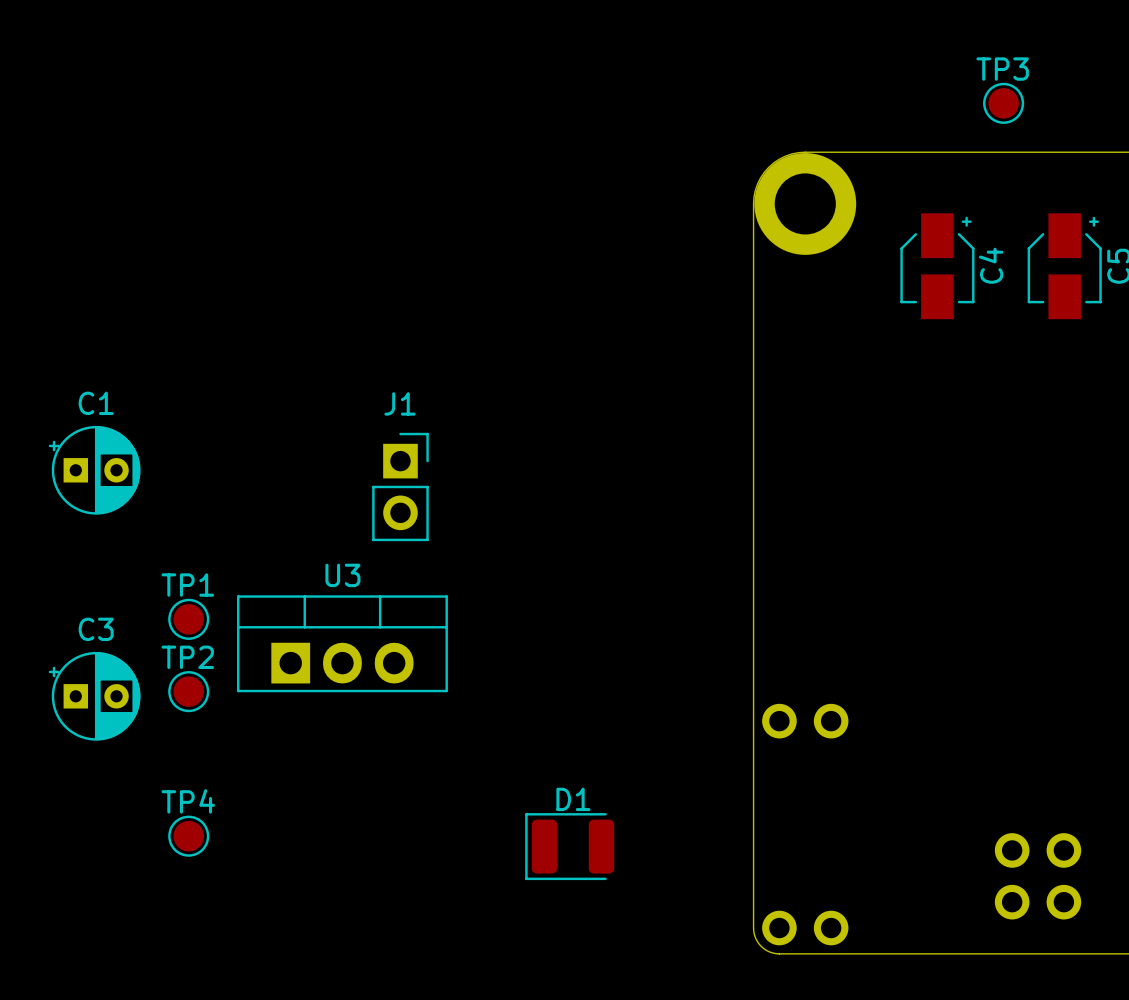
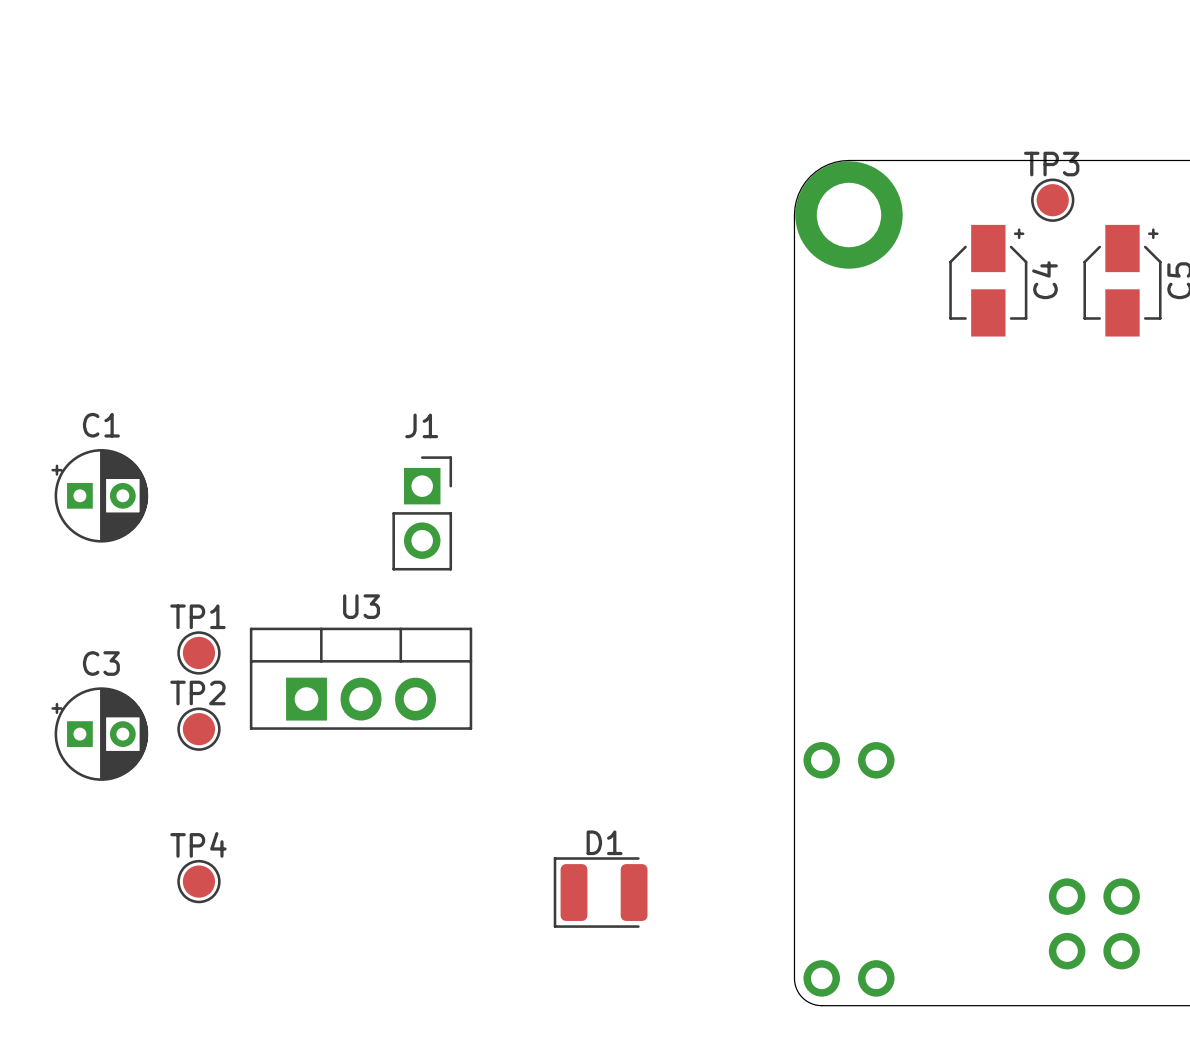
TP3 position: (1003, 103) -> (1052, 200)

